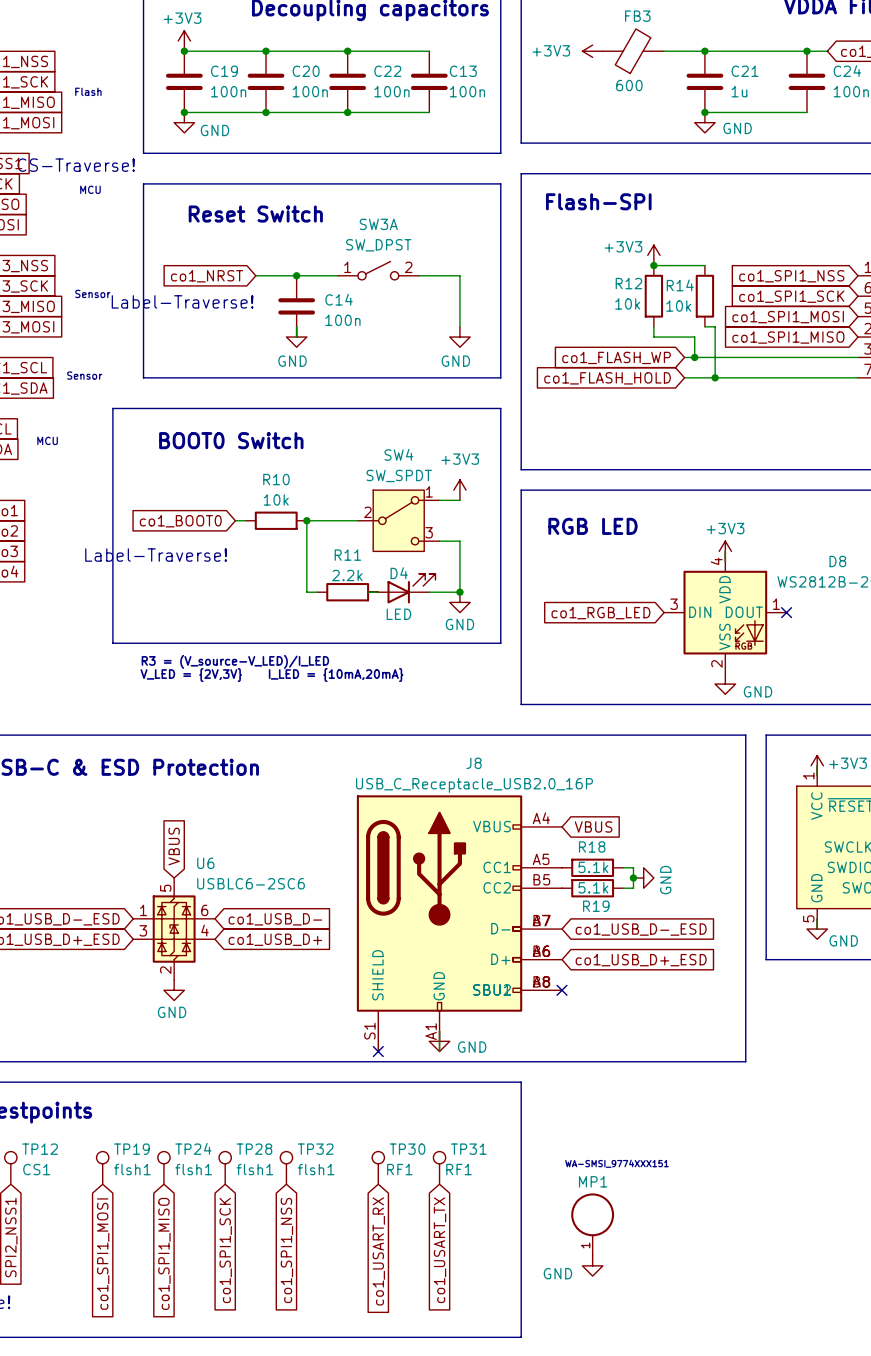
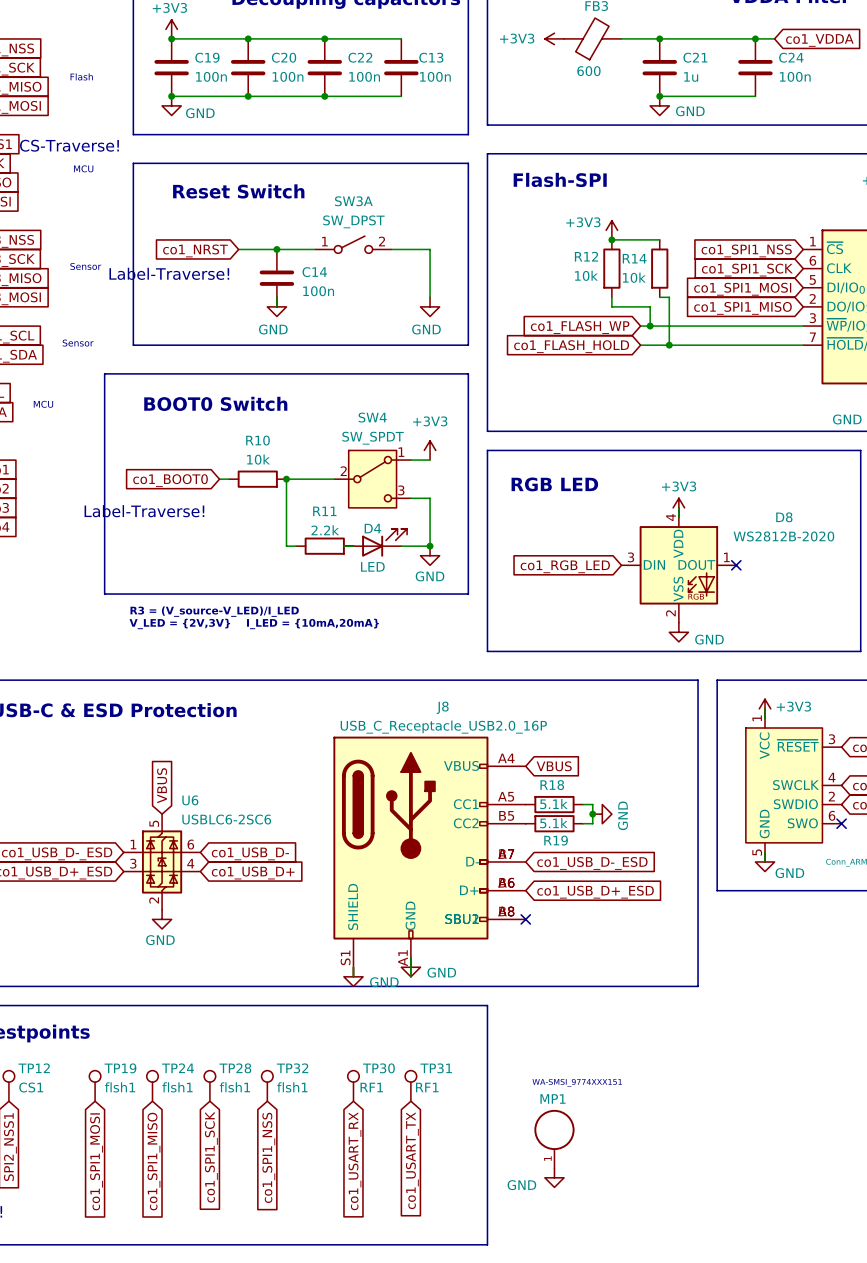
no-connect mark: (378, 1051) -> none
power symbol: none -> GND (353, 976)

